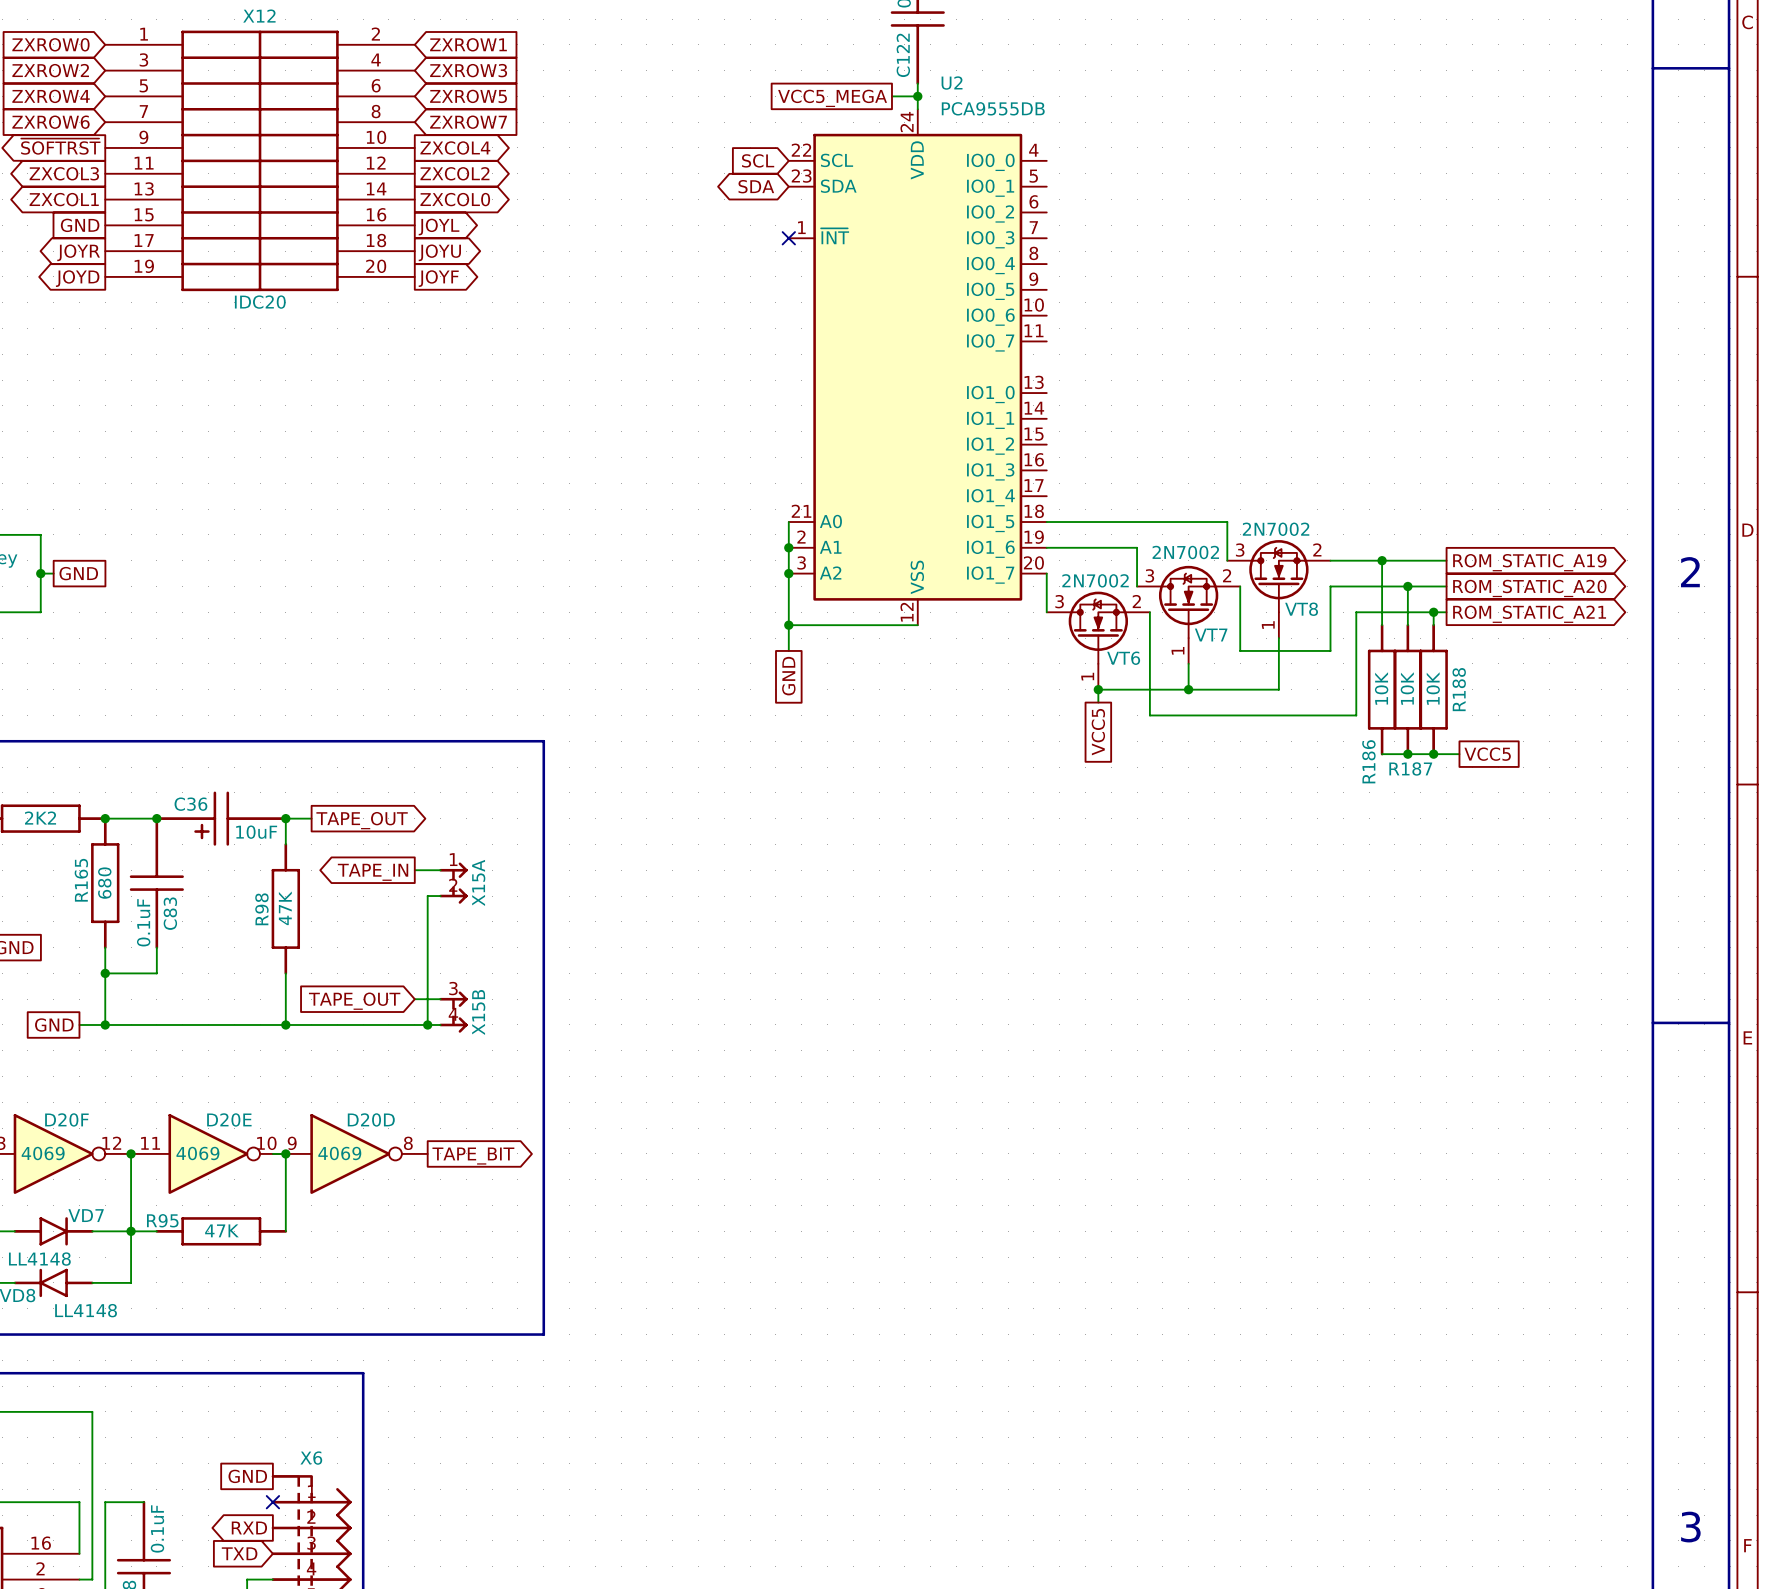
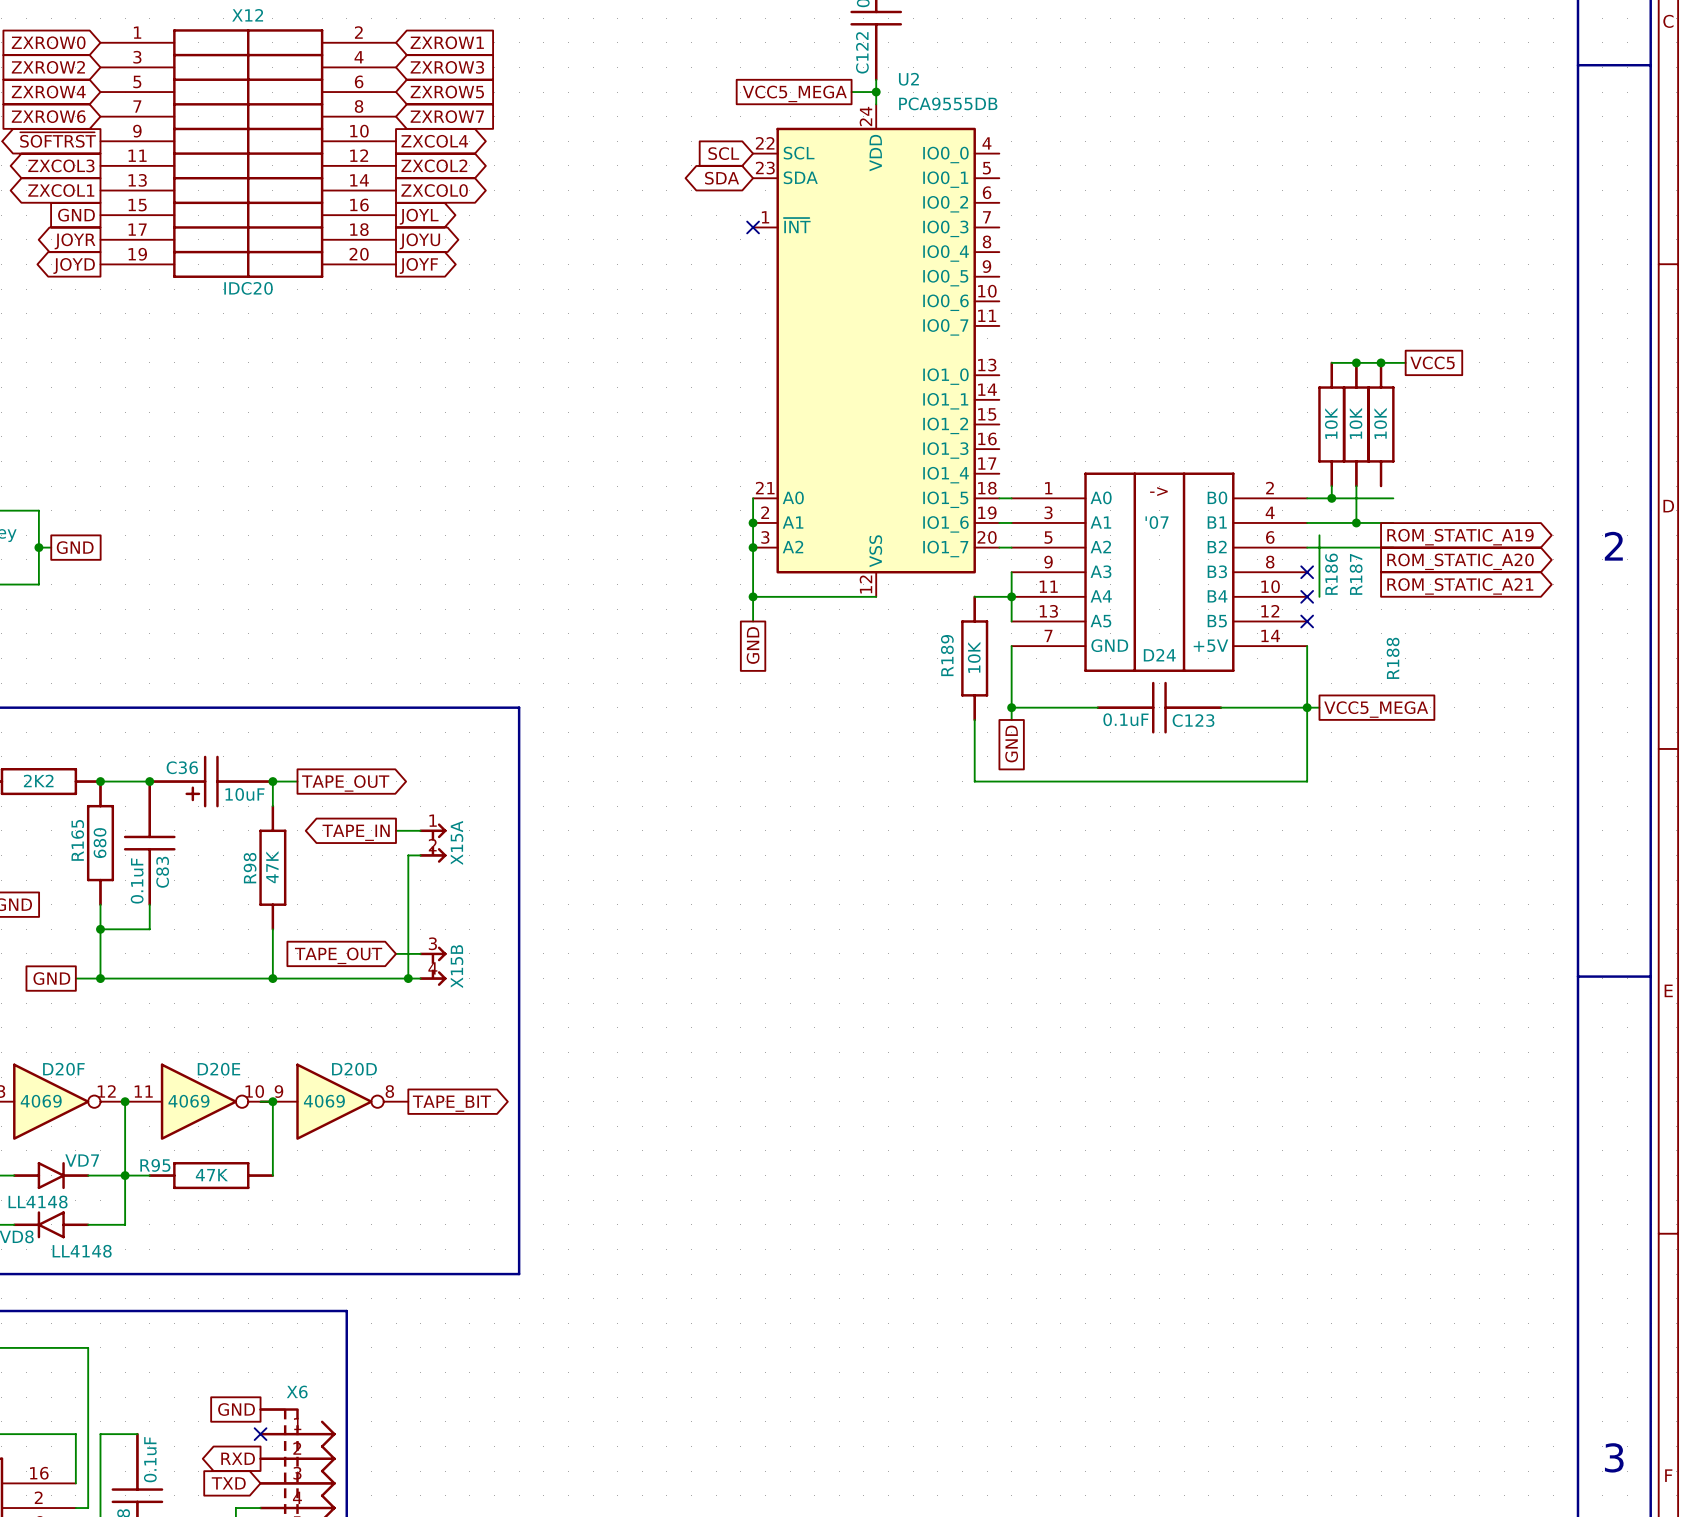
wire: none -> (1331, 362) (1405, 362)
junction: none -> (1356, 362)
junction: none -> (1381, 362)
global label: none -> VCC5 (1432, 362)
wire: (1059, 522) (1227, 522) (1227, 560) -> none
wire: none -> (1307, 498) (1393, 498)
junction: none -> (1331, 498)
wire: none -> (1307, 522) (1393, 522)
junction: none -> (1356, 522)
wire: (1330, 560) (1446, 560) -> none
junction: (1382, 560) -> none
wire: (1046, 573) (1046, 612) -> (999, 547) (1011, 547)
wire: none -> (1307, 547) (1393, 547)
wire: (1240, 586) (1240, 650) (1330, 650) (1330, 586) (1446, 586) -> none
wire: (1407, 586) (1407, 625) -> (1356, 486) (1356, 522)
junction: (1407, 586) -> none
VT8: 2N7002 (1278, 589) -> none
wire: none -> (1011, 572) (1011, 621)
D24: none -> '07 (1159, 572)
no-connect mark: none -> (1307, 572)
wire: (1149, 612) (1149, 715) (1356, 715) (1356, 612) (1446, 612) -> none
wire: (1433, 612) (1433, 625) -> (1331, 486) (1331, 498)
junction: (1433, 612) -> none
VT7: 2N7002 (1188, 614) -> none
wire: none -> (974, 596) (1011, 596)
junction: none -> (1011, 596)
no-connect mark: none -> (1307, 596)
wire: (1278, 638) (1278, 689) (1098, 689) (1098, 702) -> none
VT6: 2N7002 (1098, 640) -> none
no-connect mark: none -> (1307, 621)
wire: none -> (1011, 646) (1011, 719)
wire: none -> (1307, 646) (1307, 781) (974, 781) (974, 719)
R189: none -> 10K (974, 658)
junction: (1098, 689) -> none
junction: (1188, 689) -> none
R186 position: (1382, 689) -> (1331, 424)
R187 position: (1407, 689) -> (1356, 424)
R188 position: (1433, 689) -> (1381, 424)
global label: VCC5 (1098, 732) -> none
wire: none -> (1011, 707) (1097, 707)
junction: none -> (1011, 707)
C123: none -> 0.1uF (1159, 707)
wire: none -> (1220, 707) (1319, 707)
junction: none -> (1307, 707)
junction: (1407, 754) -> none
junction: (1433, 754) -> none
global label: VCC5 (1487, 754) -> VCC5_MEGA (1376, 709)
R186 name position: R186 (1368, 761) -> R186 (1331, 574)
R187 name rotation: 0° (1410, 768) -> 90° counterclockwise (1356, 574)
R187 name position: R187 (1410, 768) -> R187 (1356, 574)
global label: none -> GND (1011, 743)

